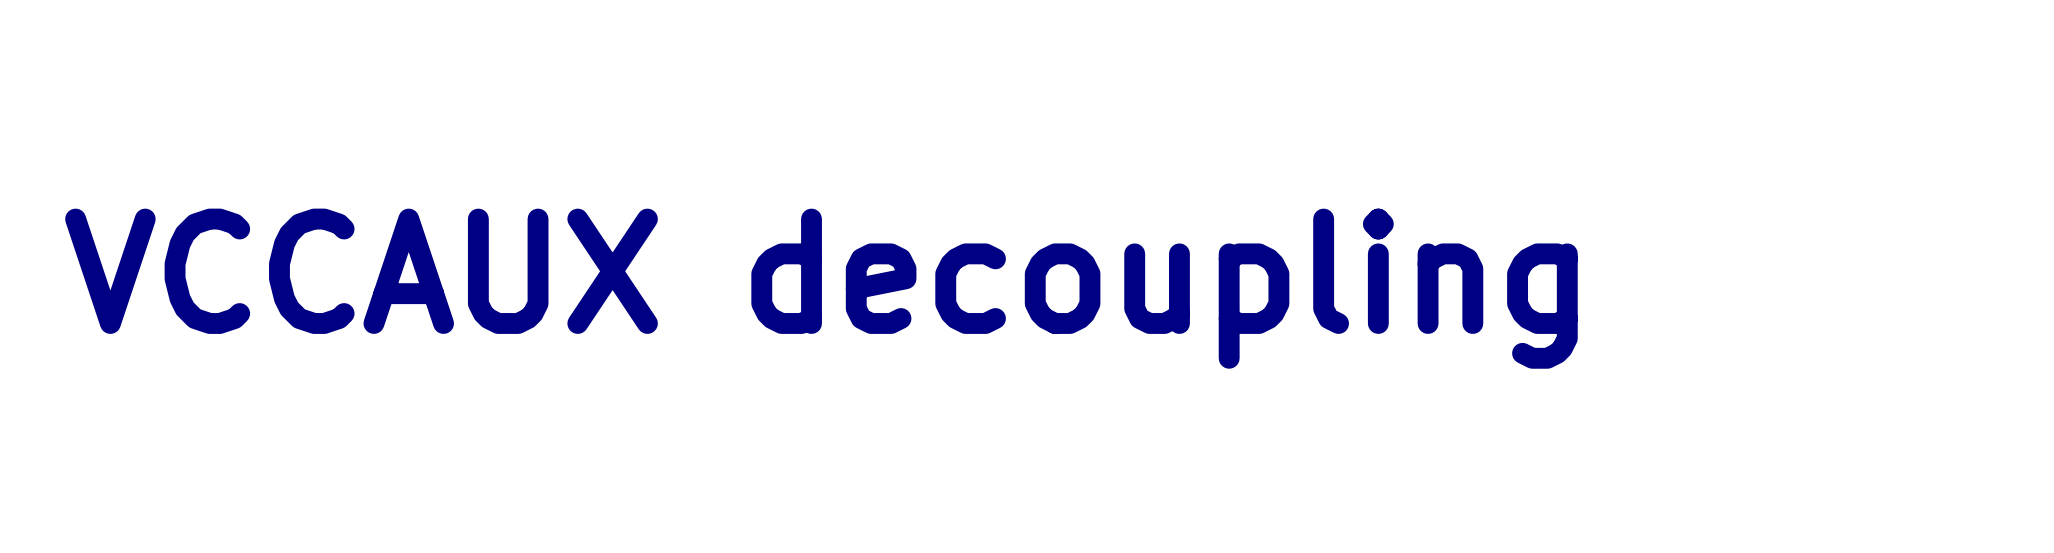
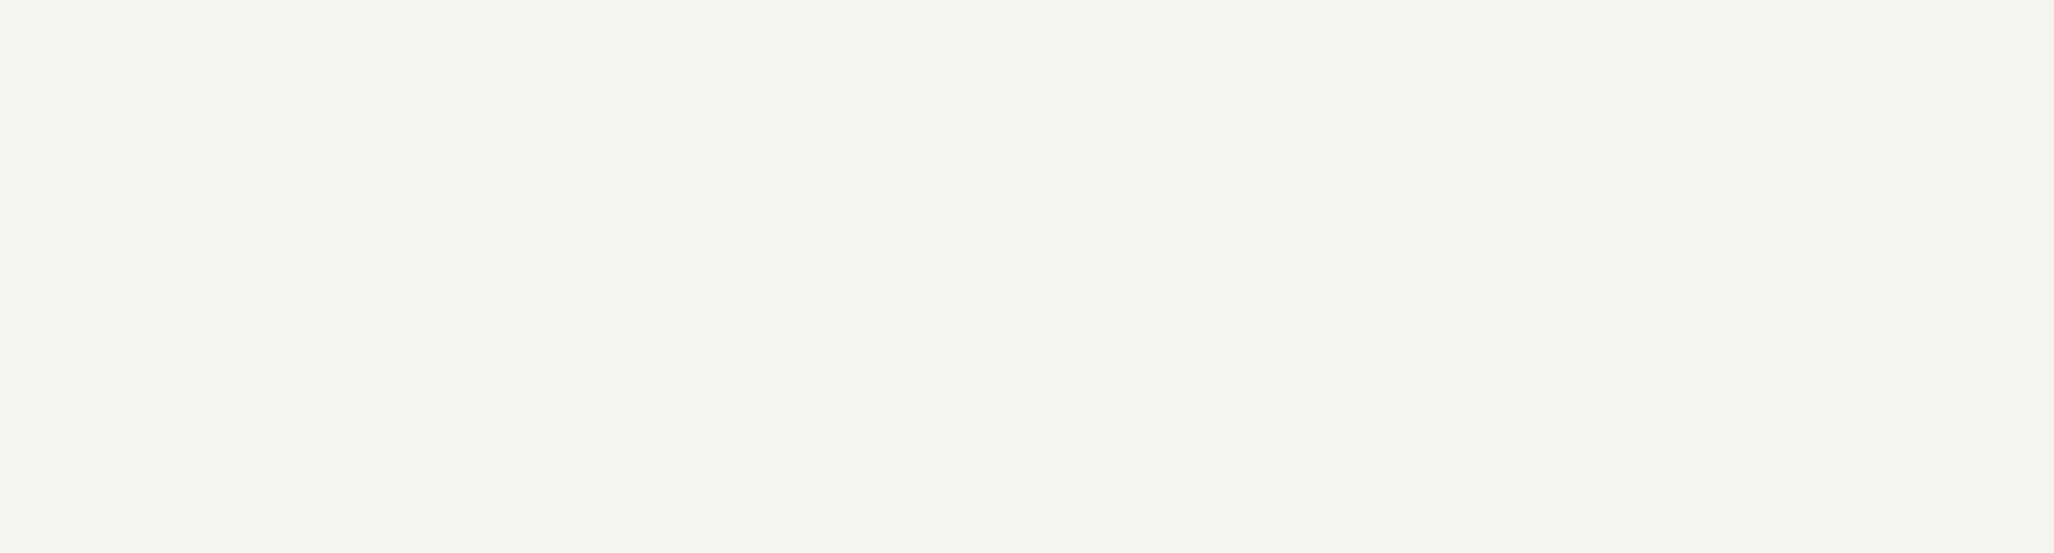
text: VCCAUX decoupling (821, 288) -> none

